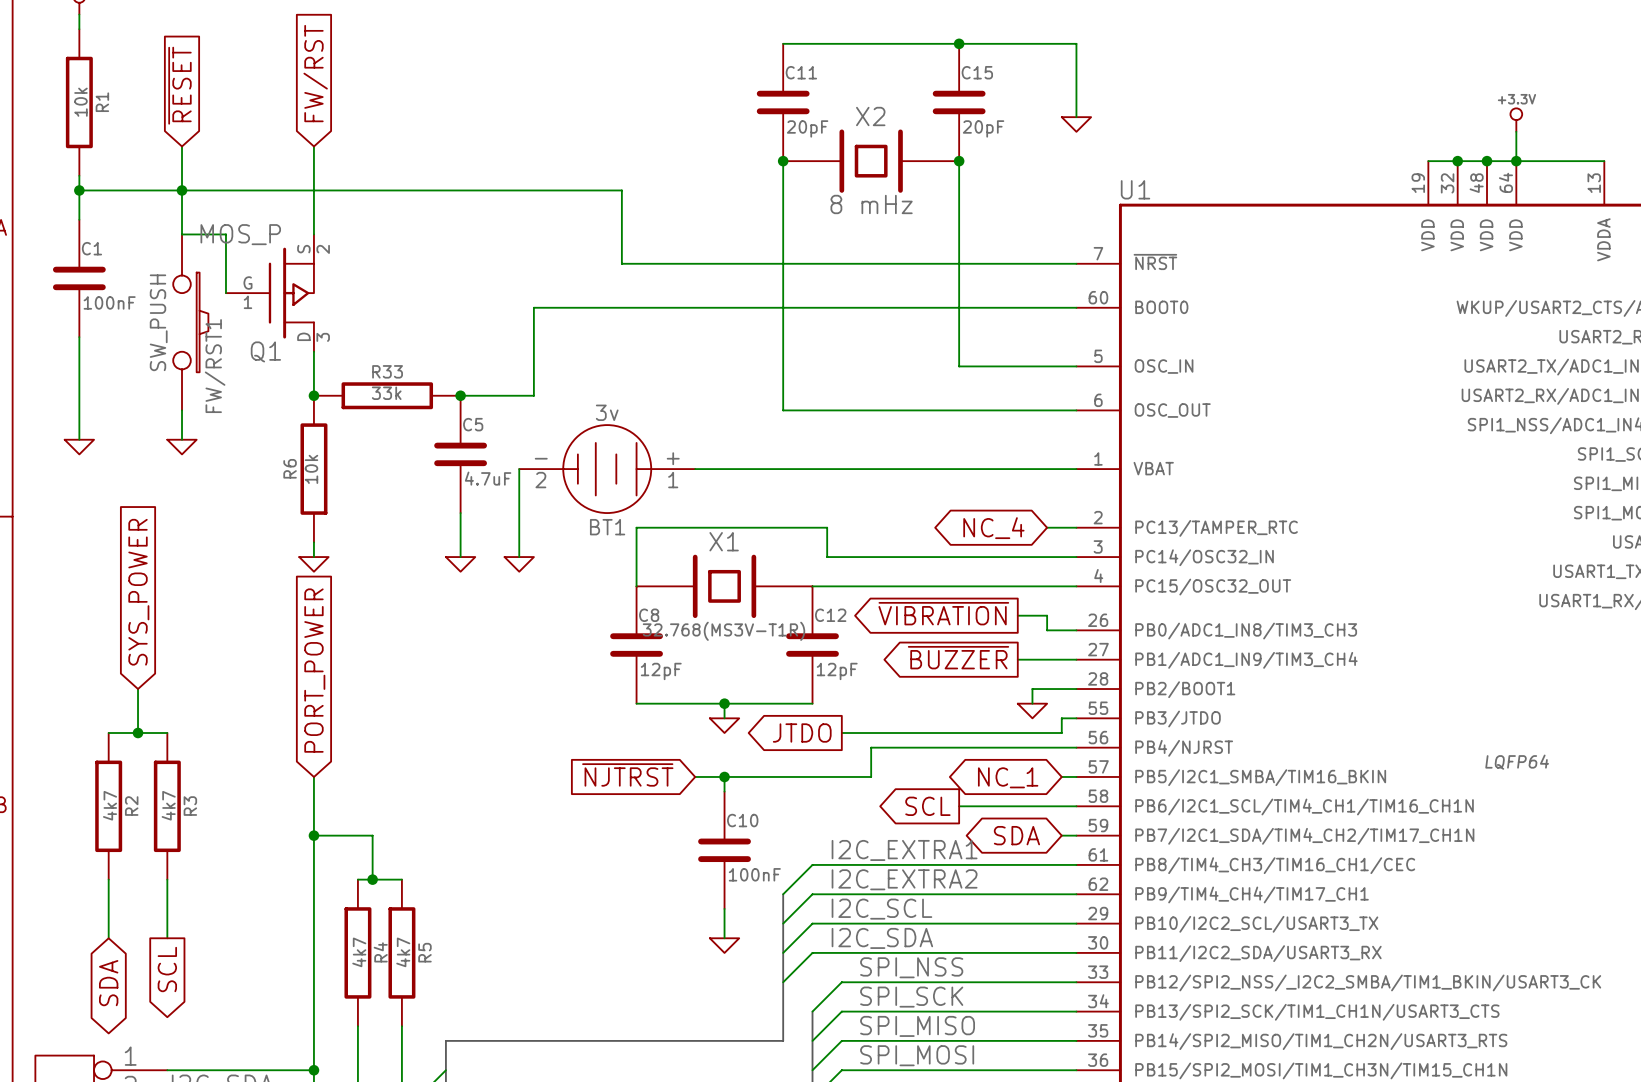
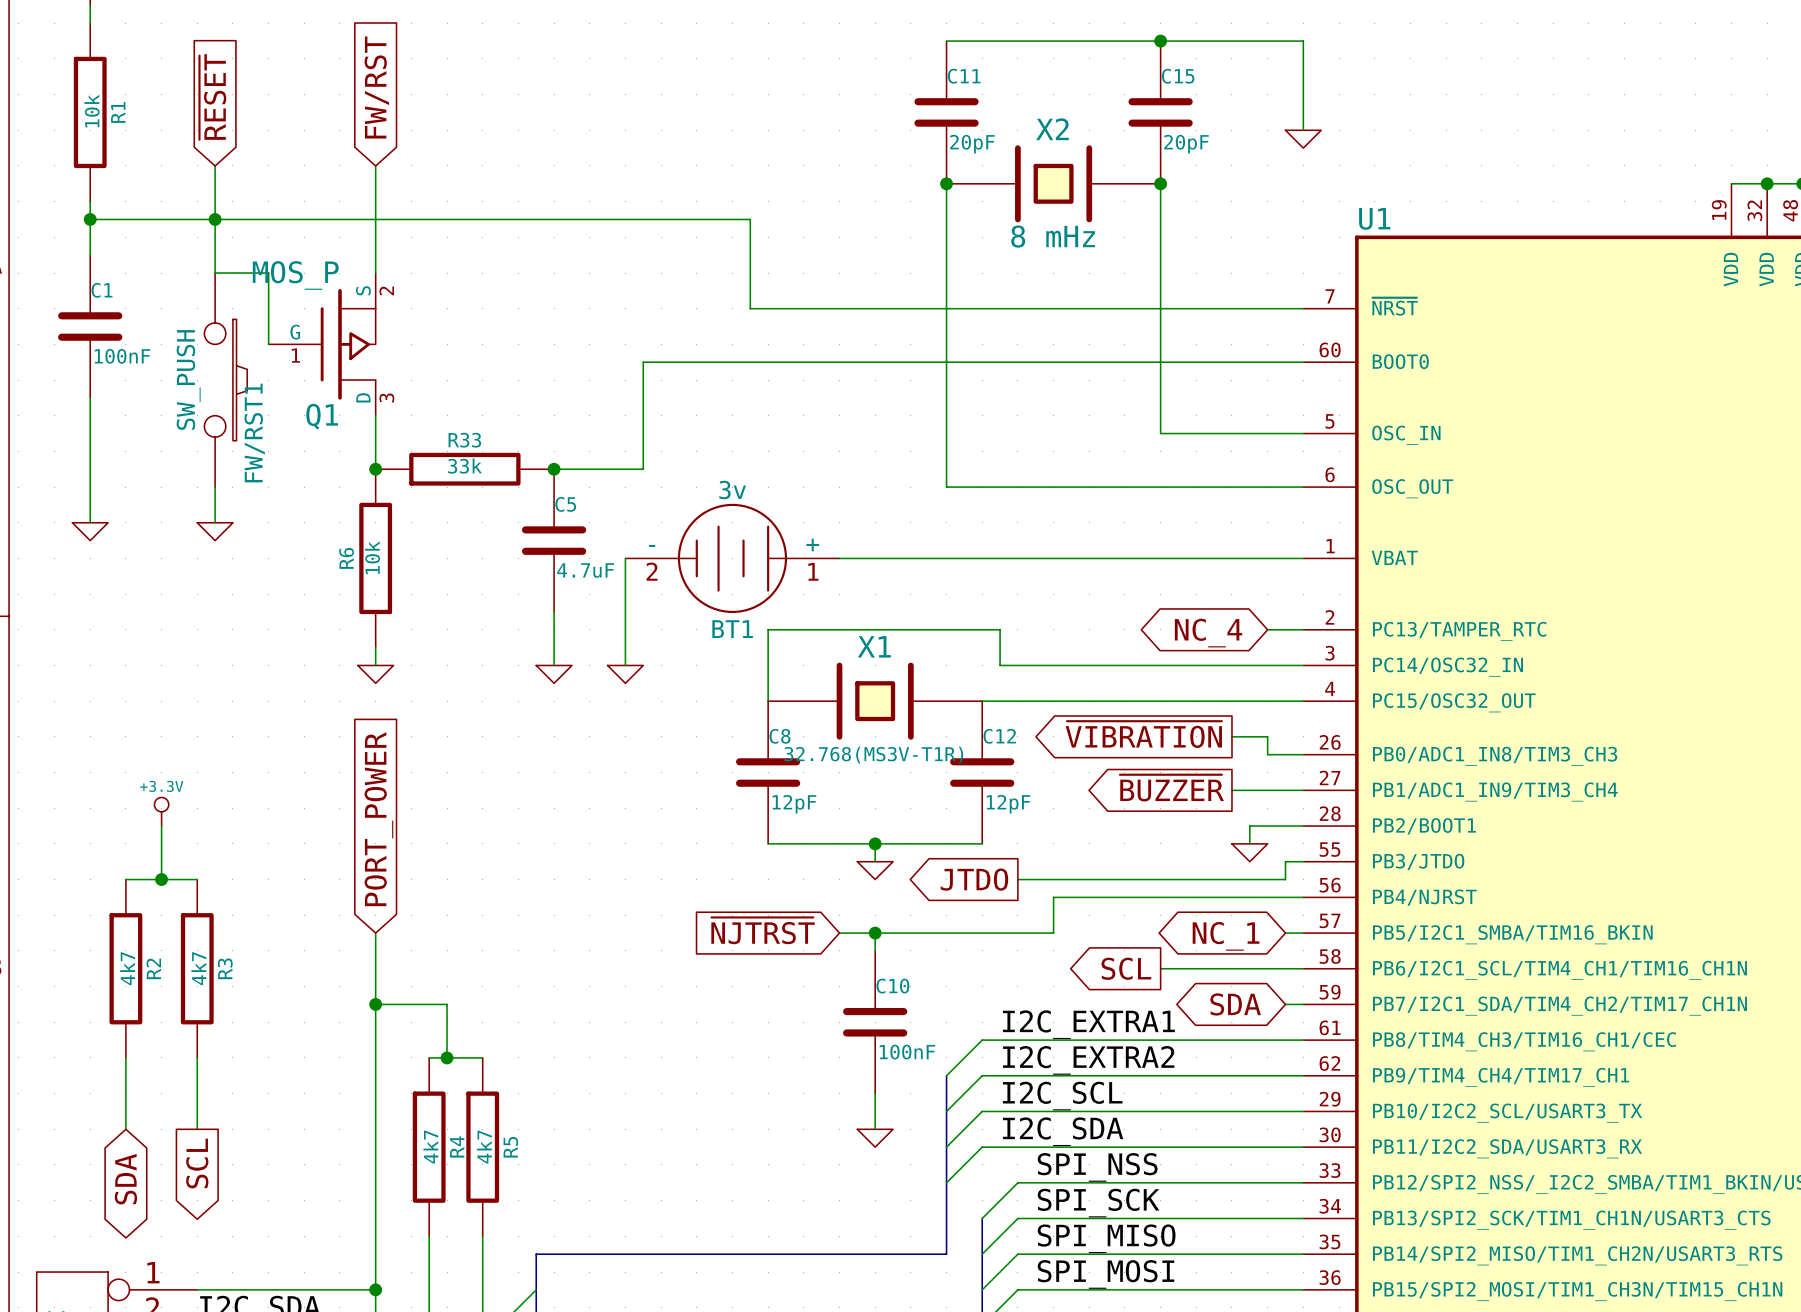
global label: SYS_POWER (138, 592) -> none
power symbol: none -> +3.3V (161, 811)

